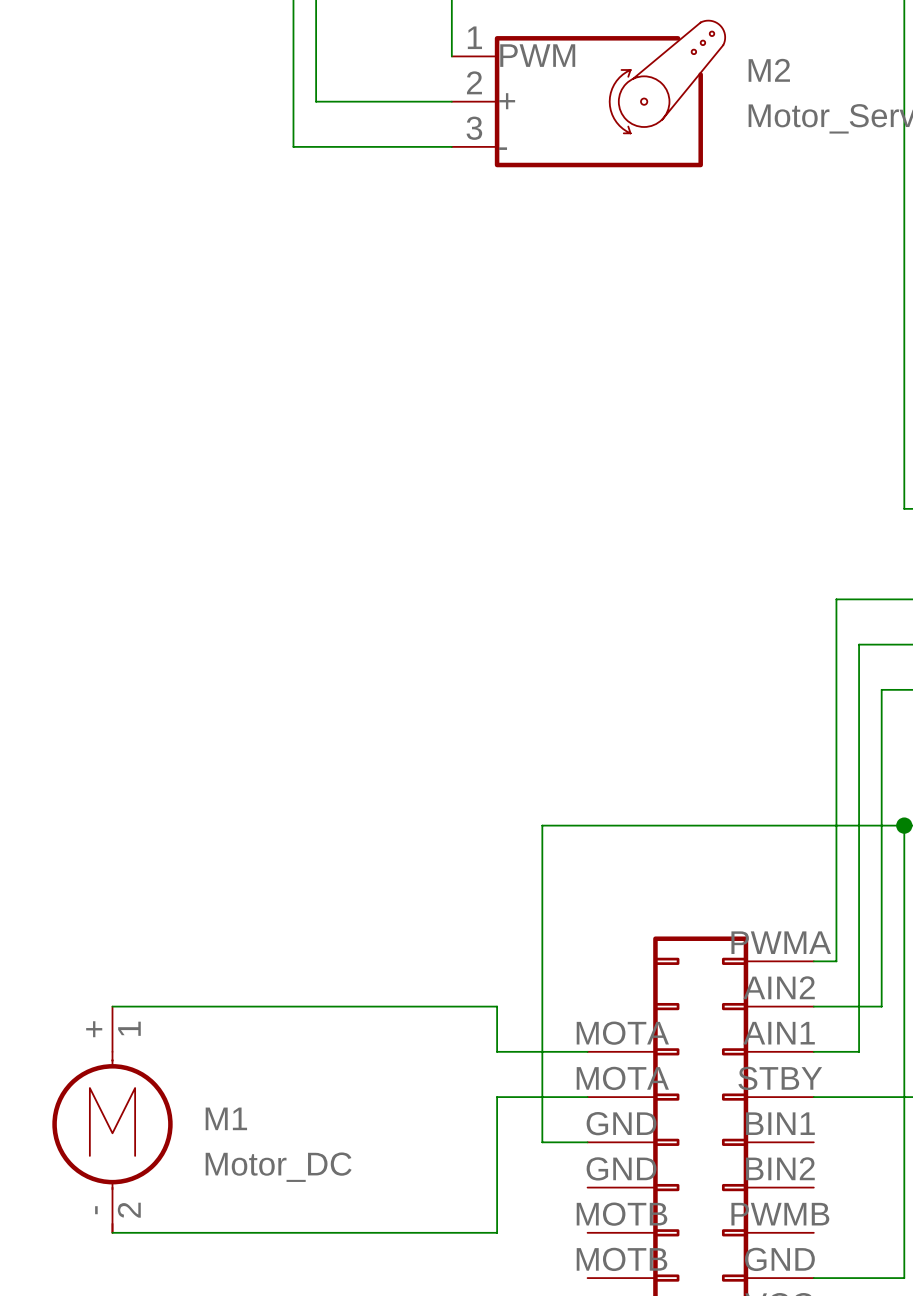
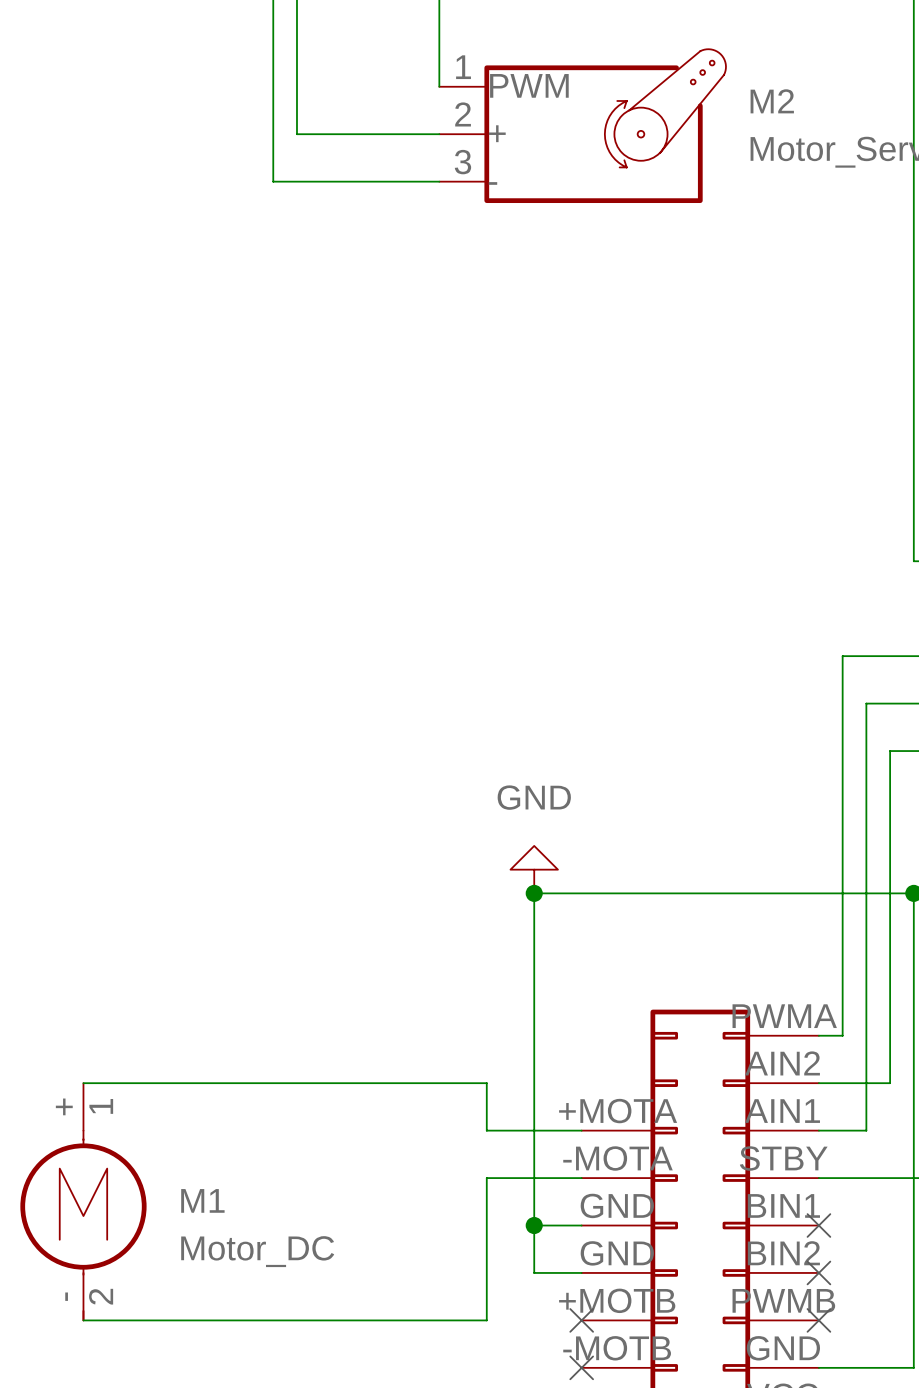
power symbol: none -> GND (534, 869)
junction: none -> (534, 893)
part pin number: MOTA (622, 1033) -> +MOTA (618, 1111)
part pin number: MOTA (622, 1078) -> -MOTA (618, 1158)
wire: none -> (534, 1225) (534, 1272) (581, 1272)
junction: none -> (534, 1225)
no-connect mark: none -> (818, 1225)
no-connect mark: none -> (818, 1272)
part pin number: MOTB (621, 1214) -> +MOTB (617, 1300)
no-connect mark: none -> (581, 1320)
no-connect mark: none -> (818, 1320)
part pin number: MOTB (621, 1259) -> -MOTB (617, 1348)
no-connect mark: none -> (581, 1367)

